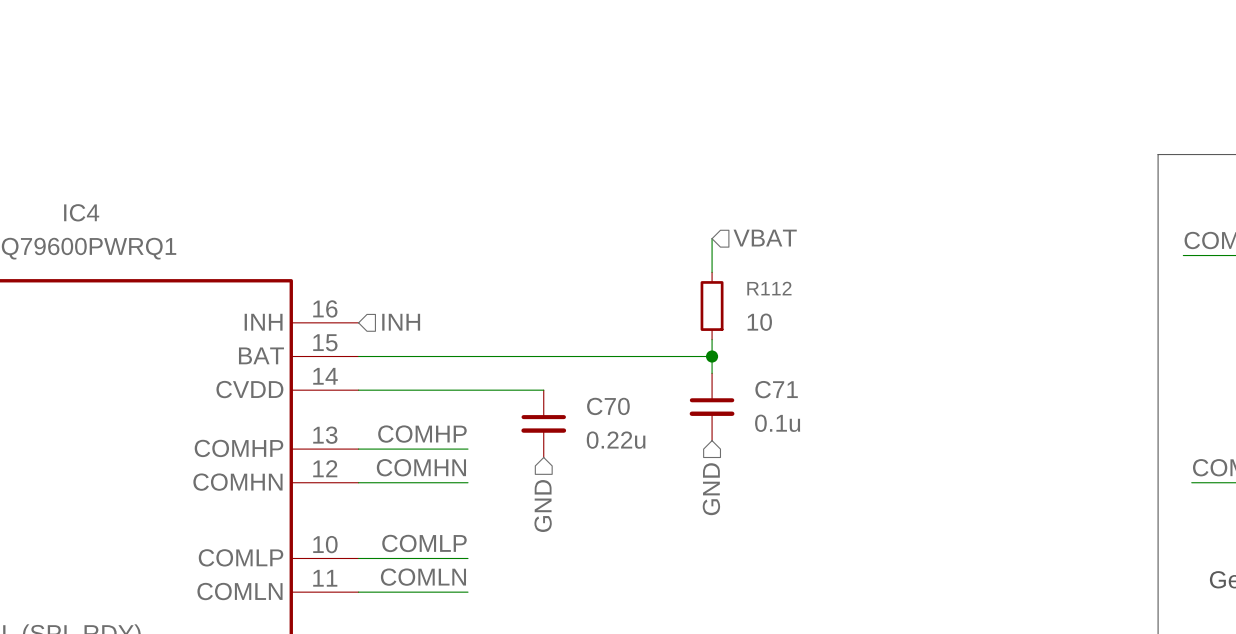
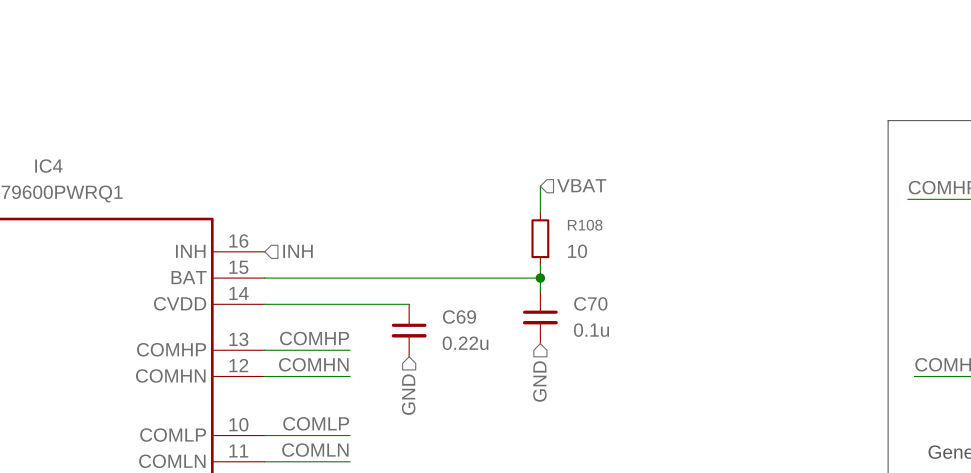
R112 name: R112 (769, 288) -> R108 (585, 225)
C71 name: C71 (776, 389) -> C70 (590, 303)
C70 name: C70 (608, 406) -> C69 (459, 317)

